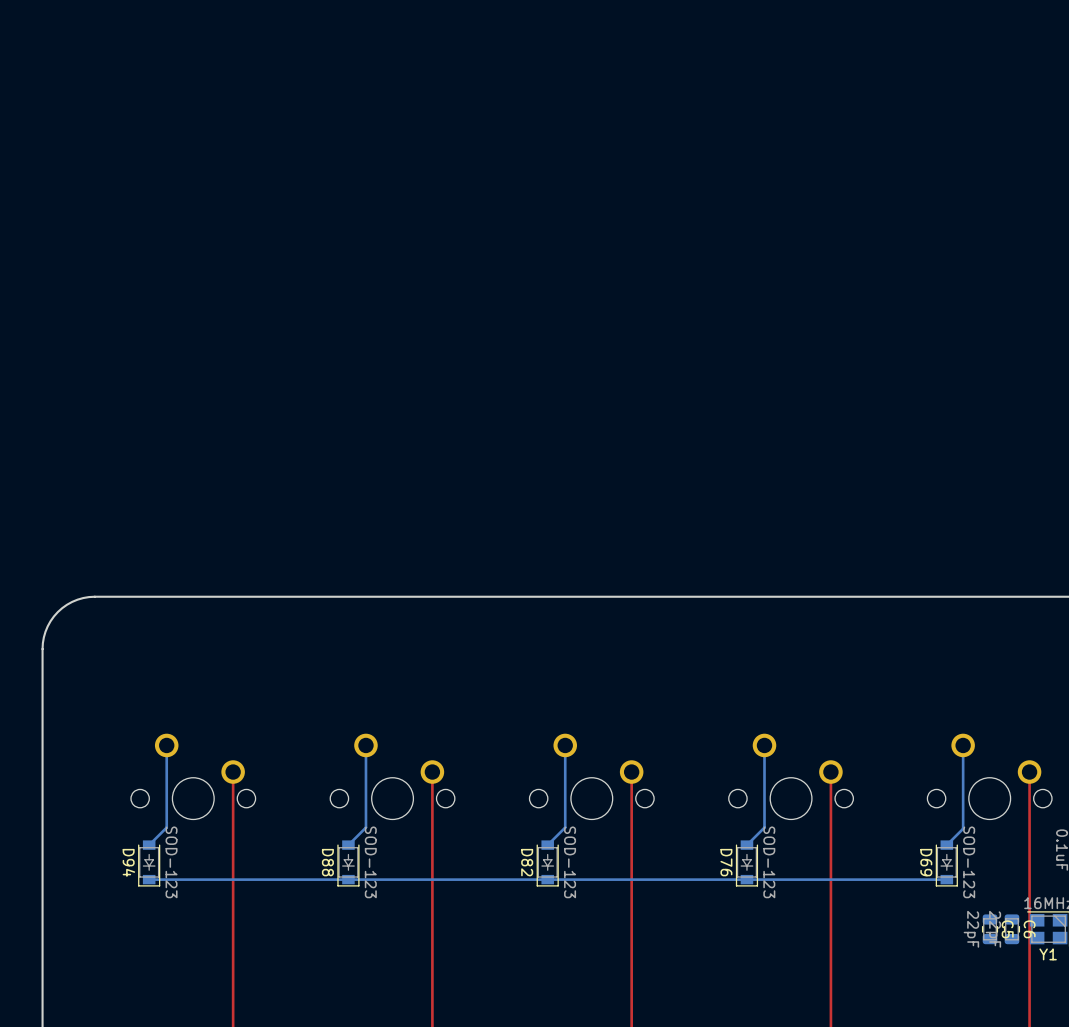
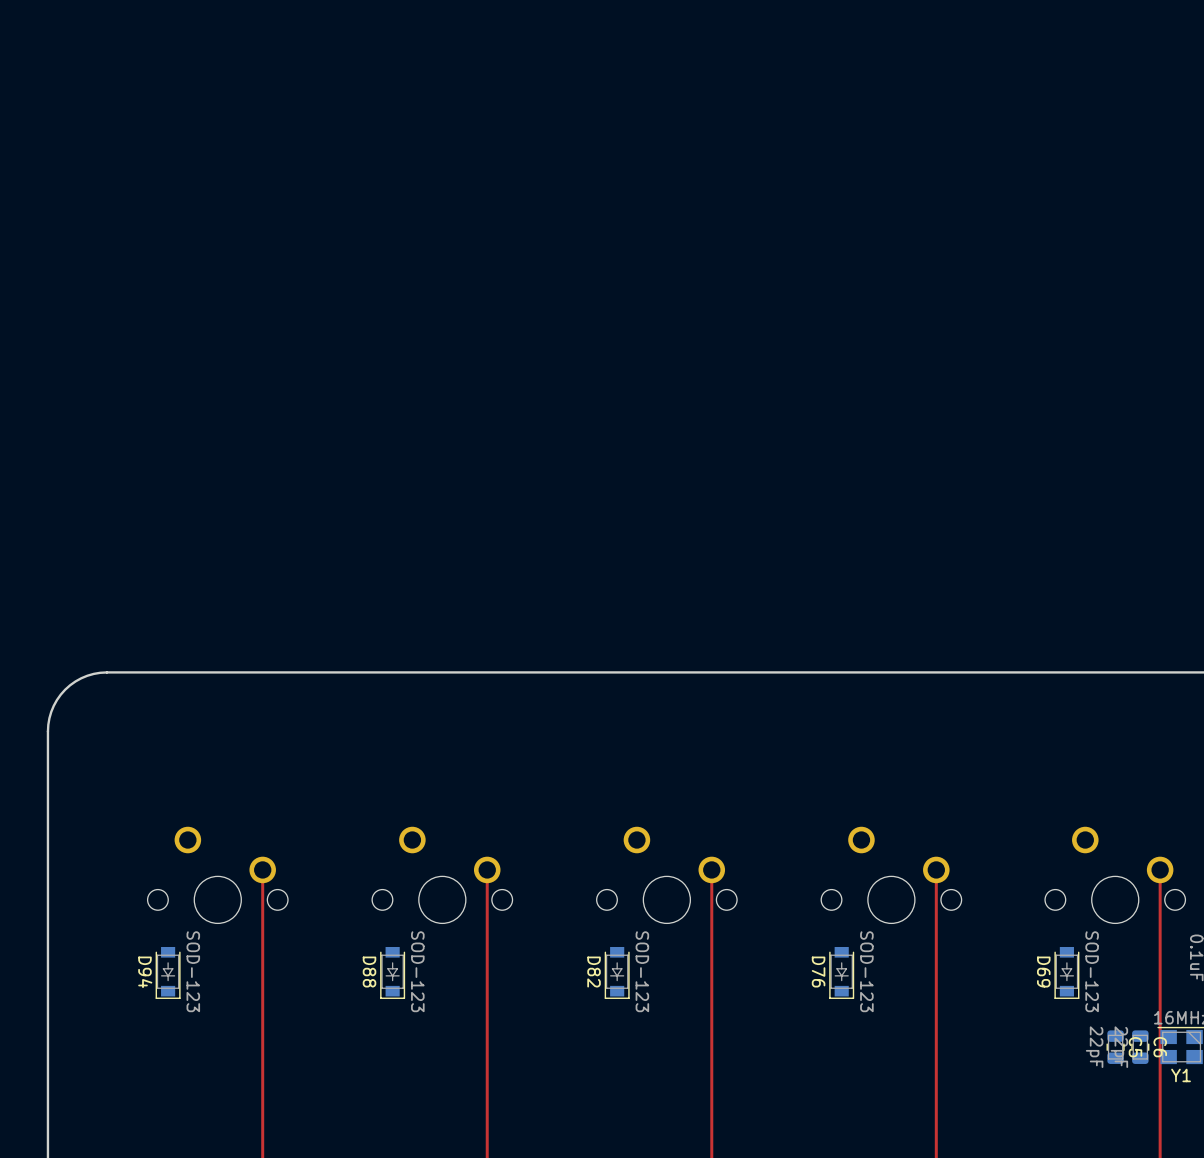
bottom track: (166, 745) (166, 827) (149, 845) -> none
bottom track: (365, 745) (365, 827) (348, 845) -> none
bottom track: (565, 745) (565, 827) (547, 845) -> none
bottom track: (764, 745) (764, 827) (746, 845) -> none
bottom track: (963, 745) (963, 828) (946, 845) -> none
bottom track: (946, 879) (149, 879) -> none

